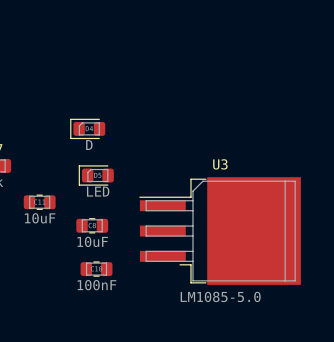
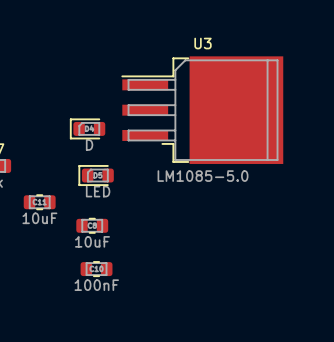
U3 position: (220, 231) -> (202, 110)

